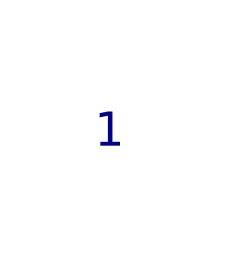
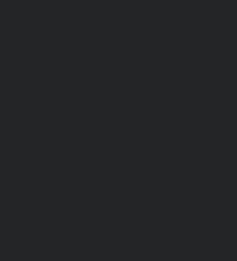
text: 1 (109, 128) -> none

